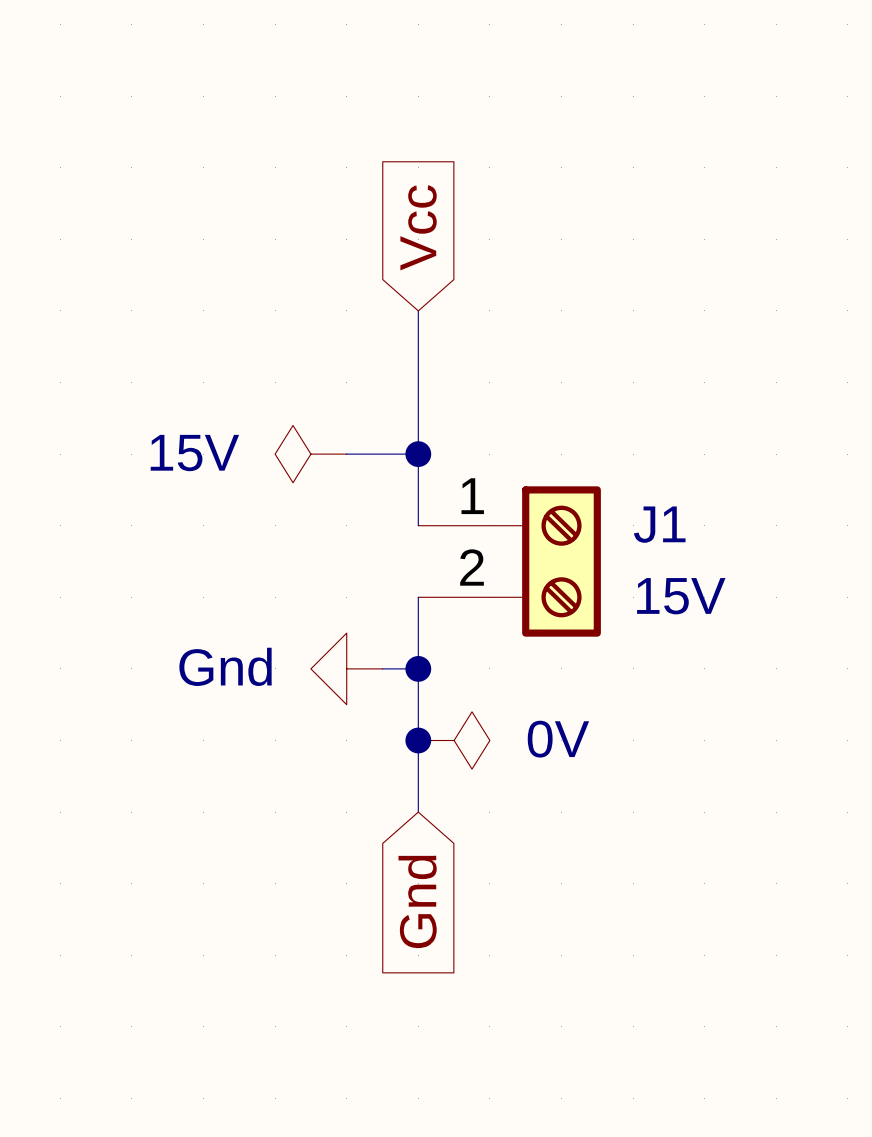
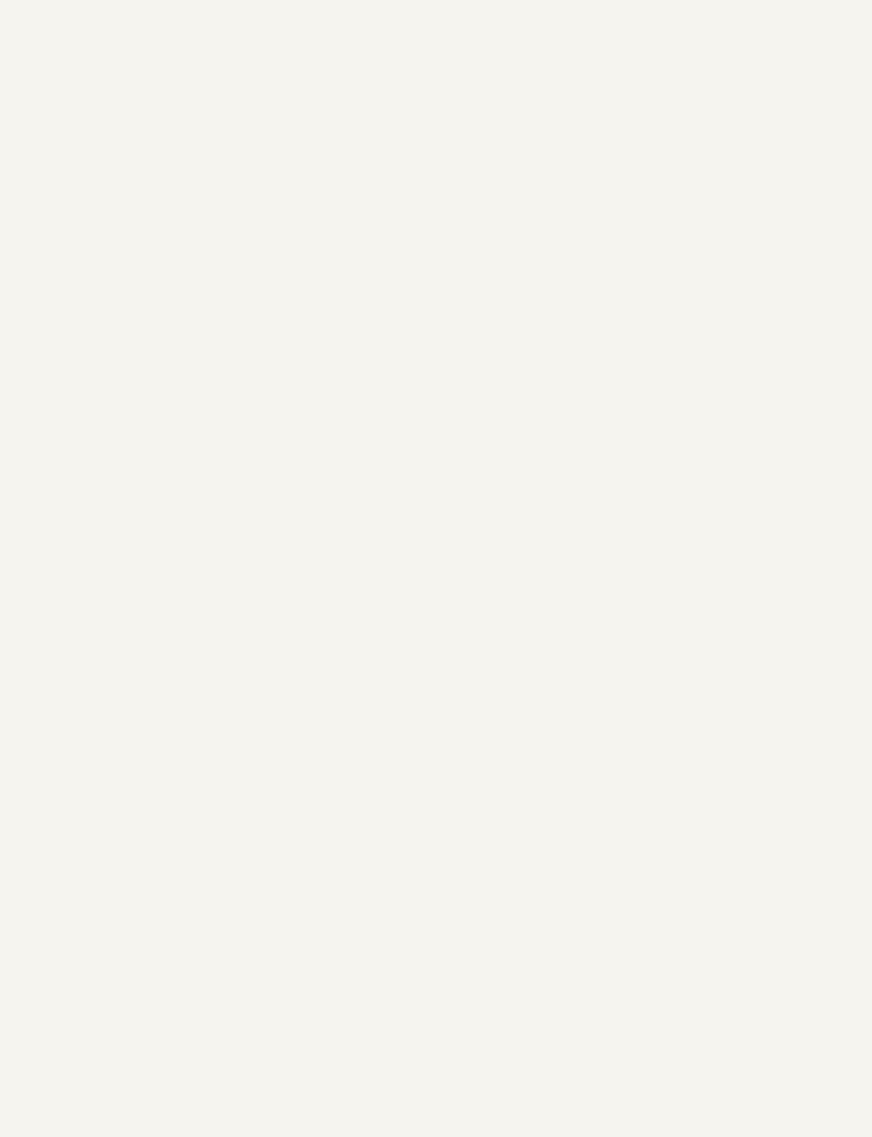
global label: Vcc (418, 227) -> none
wire: (418, 310) (418, 525) -> none
power symbol: 15V (310, 454) -> none
wire: (346, 454) (418, 454) -> none
junction: (418, 454) -> none
J1: 15V (509, 561) -> none
wire: (418, 597) (418, 812) -> none
power symbol: Gnd (346, 668) -> none
wire: (382, 668) (418, 668) -> none
junction: (418, 668) -> none
junction: (418, 740) -> none
power symbol: 0V (454, 740) -> none
global label: Gnd (417, 901) -> none

